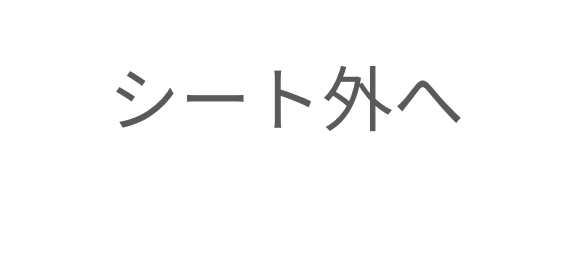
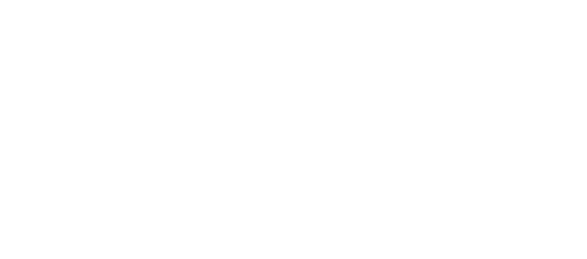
text: シート外へ (288, 98) -> none

